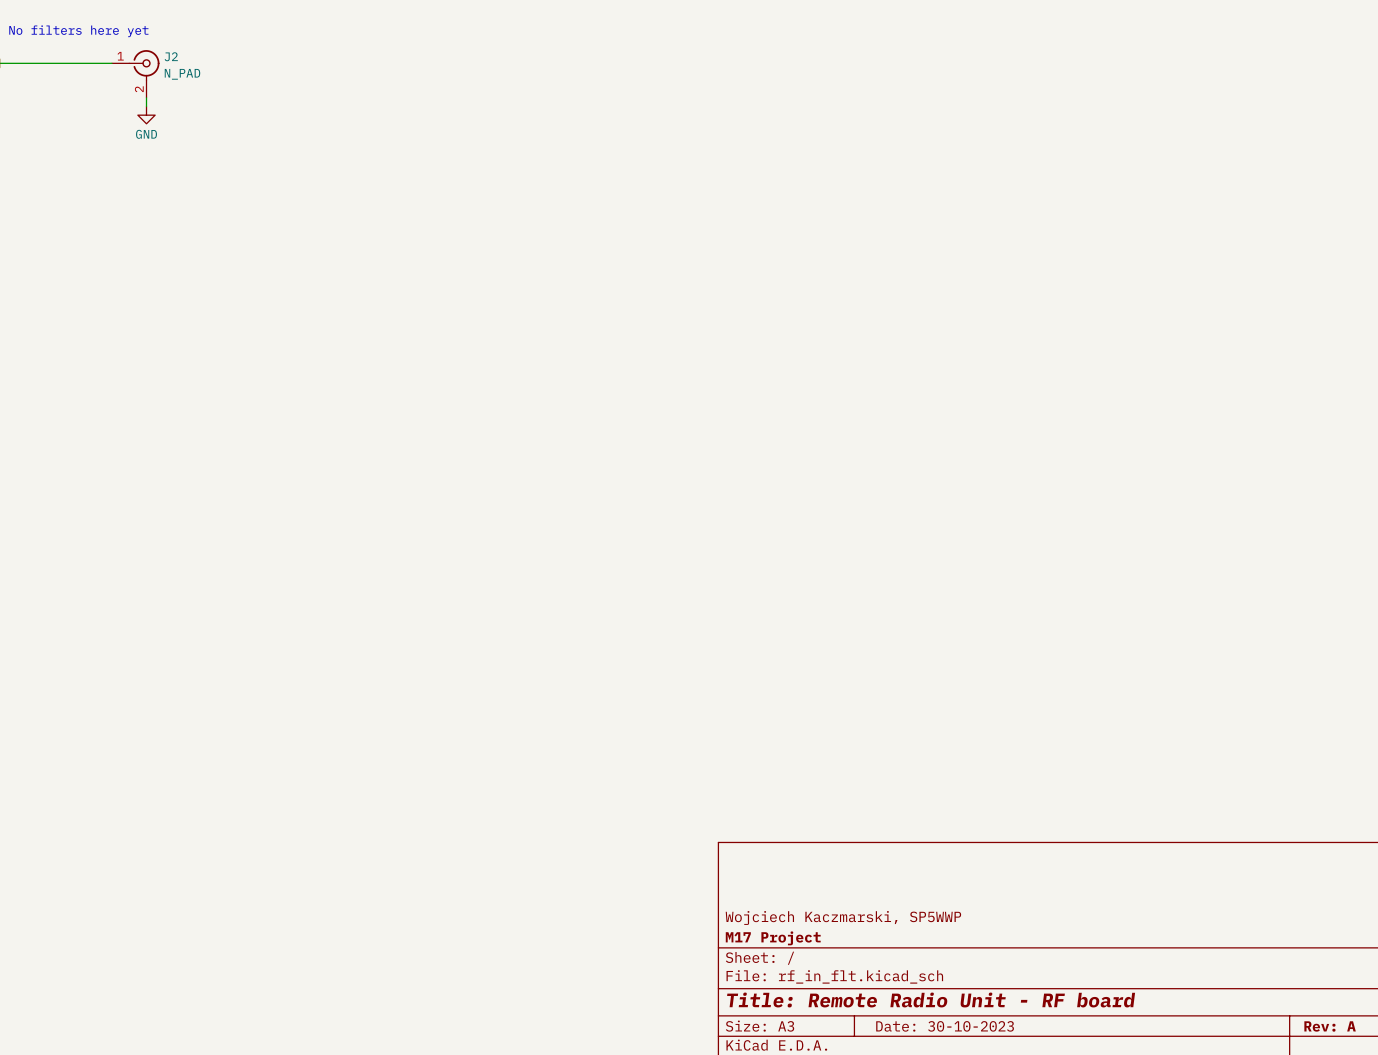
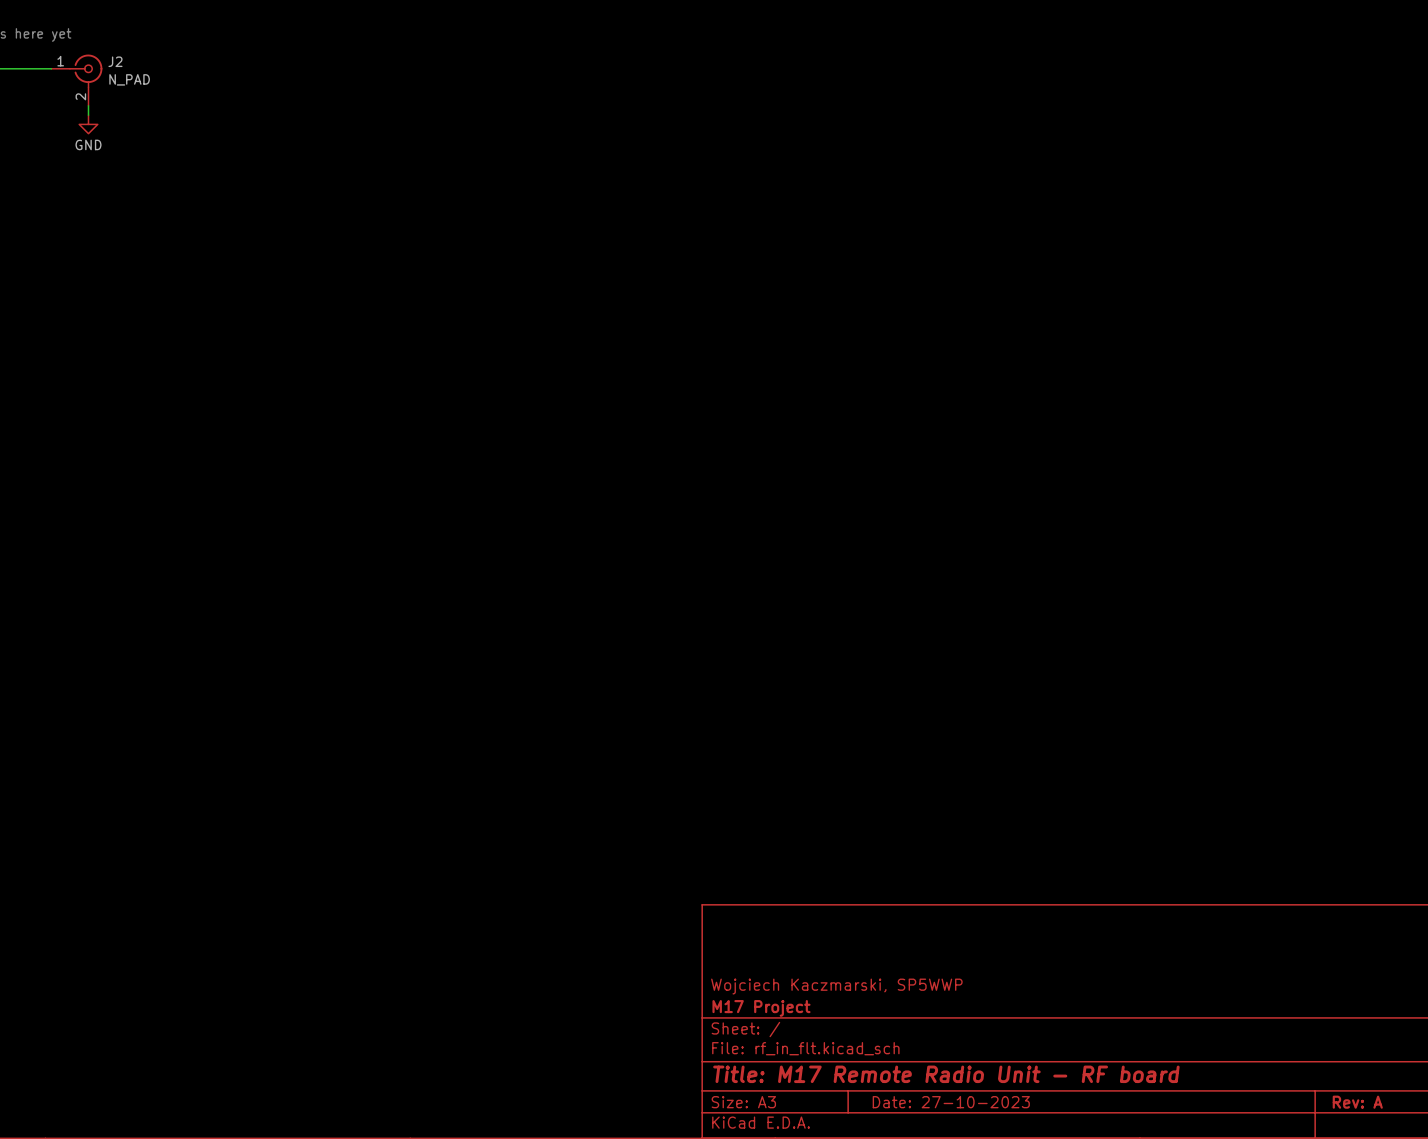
title block: Title: Remote Radio Unit - RF board (931, 1000) -> Title: M17 Remote Radio Unit - RF board (946, 1074)
title block: Date: 30-10-2023 (945, 1026) -> Date: 27-10-2023 (951, 1102)

